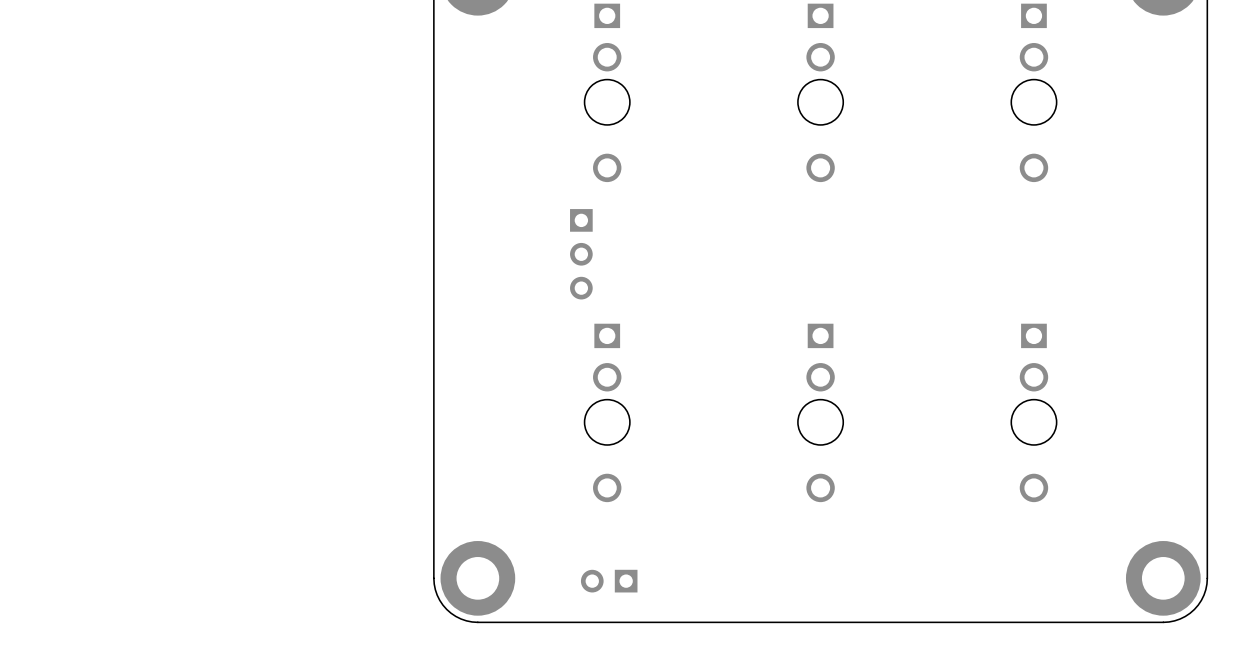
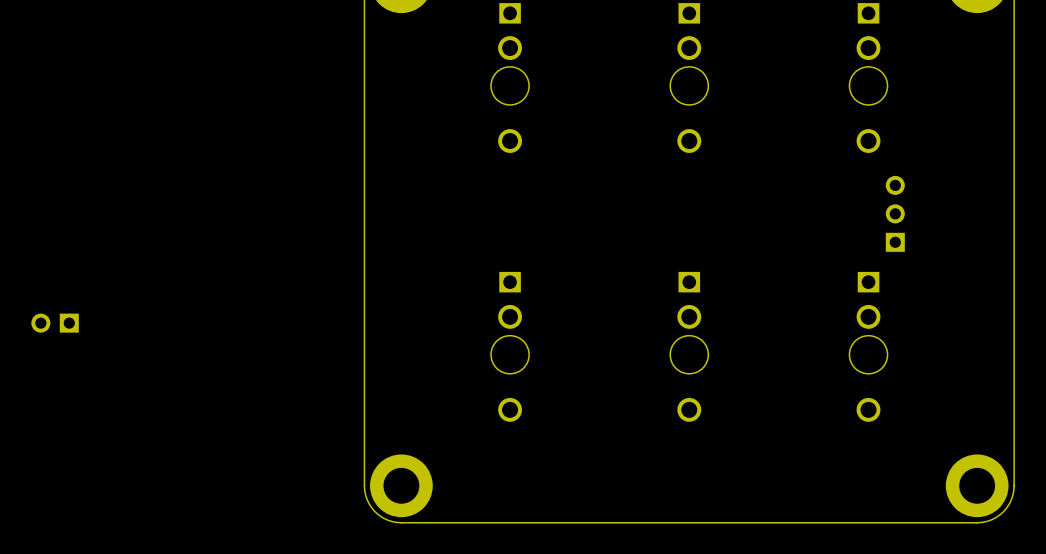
part: (581, 254) -> none
part: none -> (895, 213)
part: none -> (55, 323)
part: (609, 581) -> none

